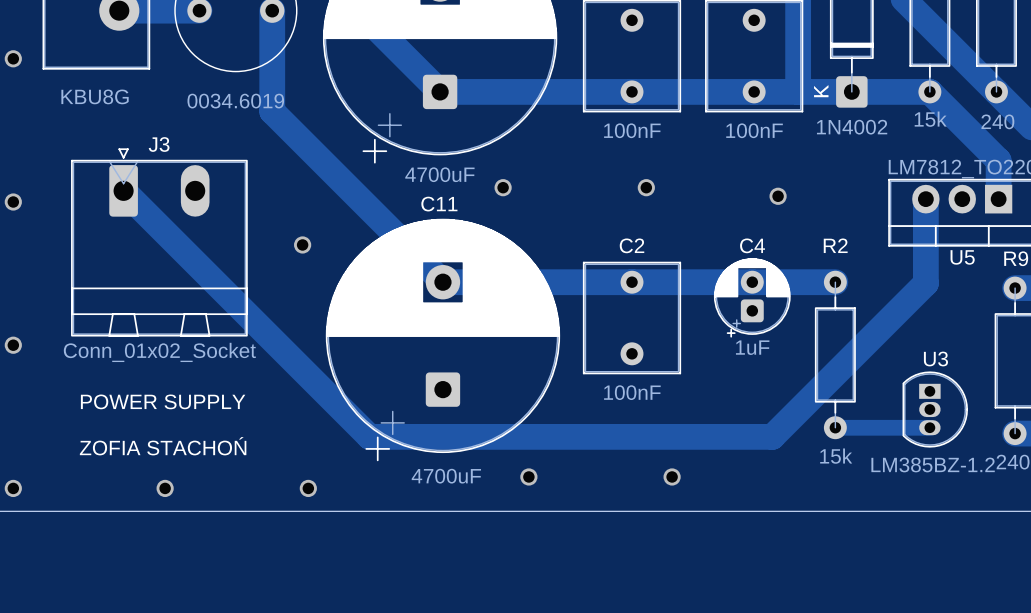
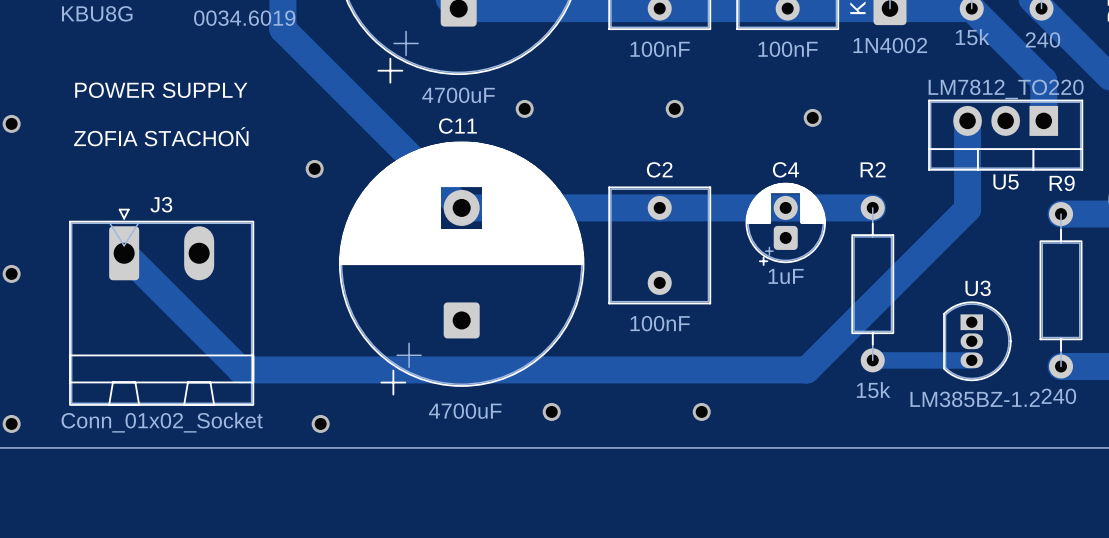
track: (123, 190) (369, 436) -> (124, 253) (240, 369) (384, 369)
J3 position: (159, 242) -> (161, 307)
text position: POWER SUPPLY (163, 401) -> POWER SUPPLY (161, 90)
text position: ZOFIA STACHOŃ (163, 446) -> ZOFIA STACHOŃ (161, 136)
via: (165, 488) -> none

